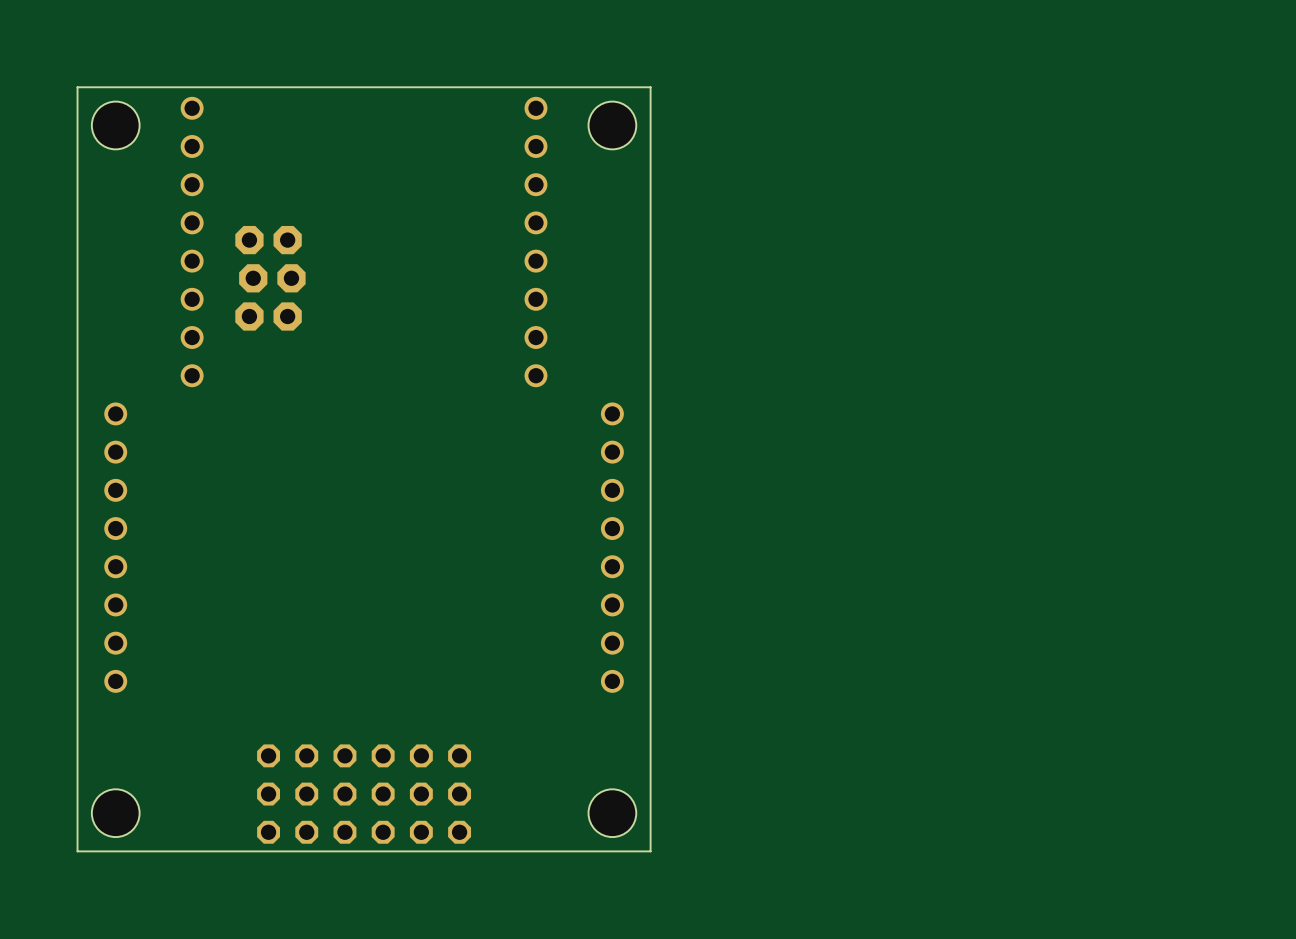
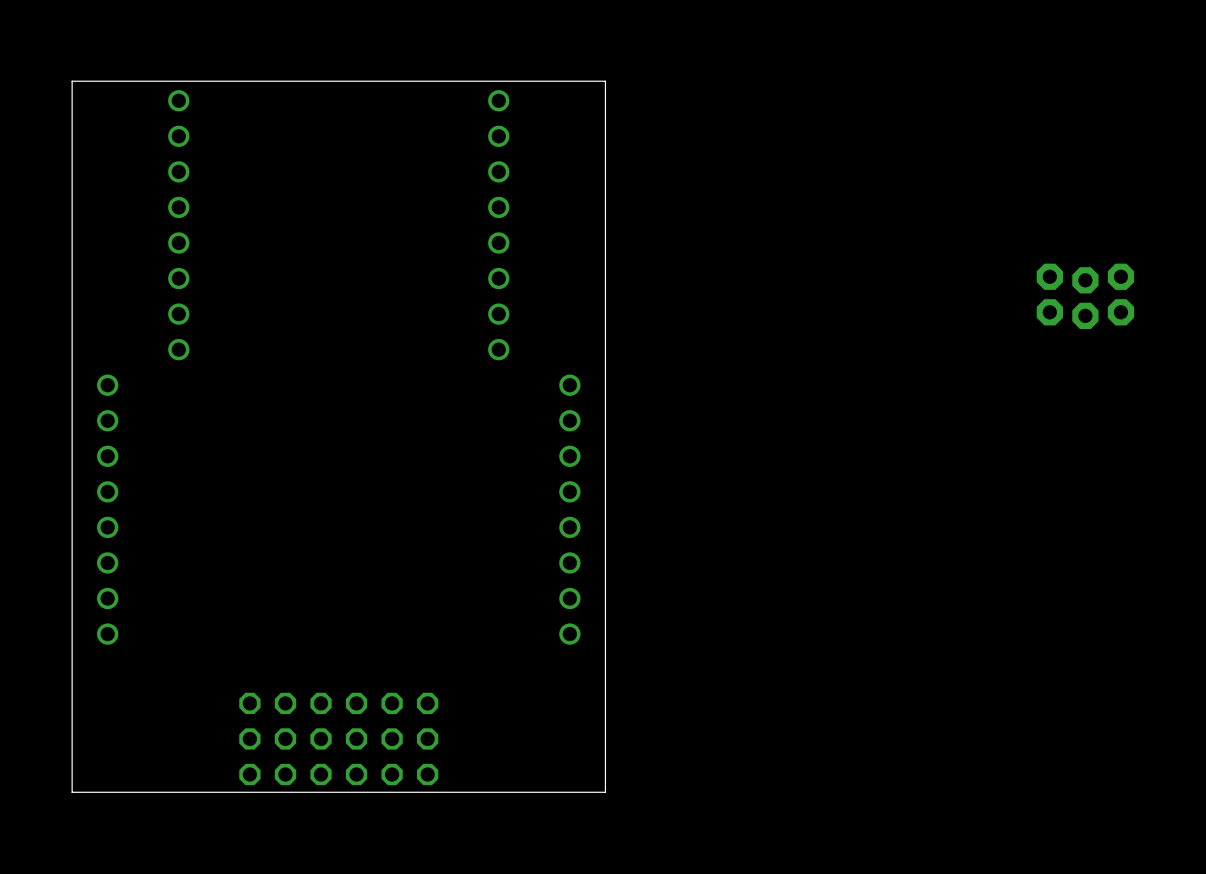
hole: (115, 125) -> none
hole: (612, 125) -> none
part: (270, 278) -> none
part: none -> (1085, 296)
hole: (115, 813) -> none
hole: (612, 813) -> none

